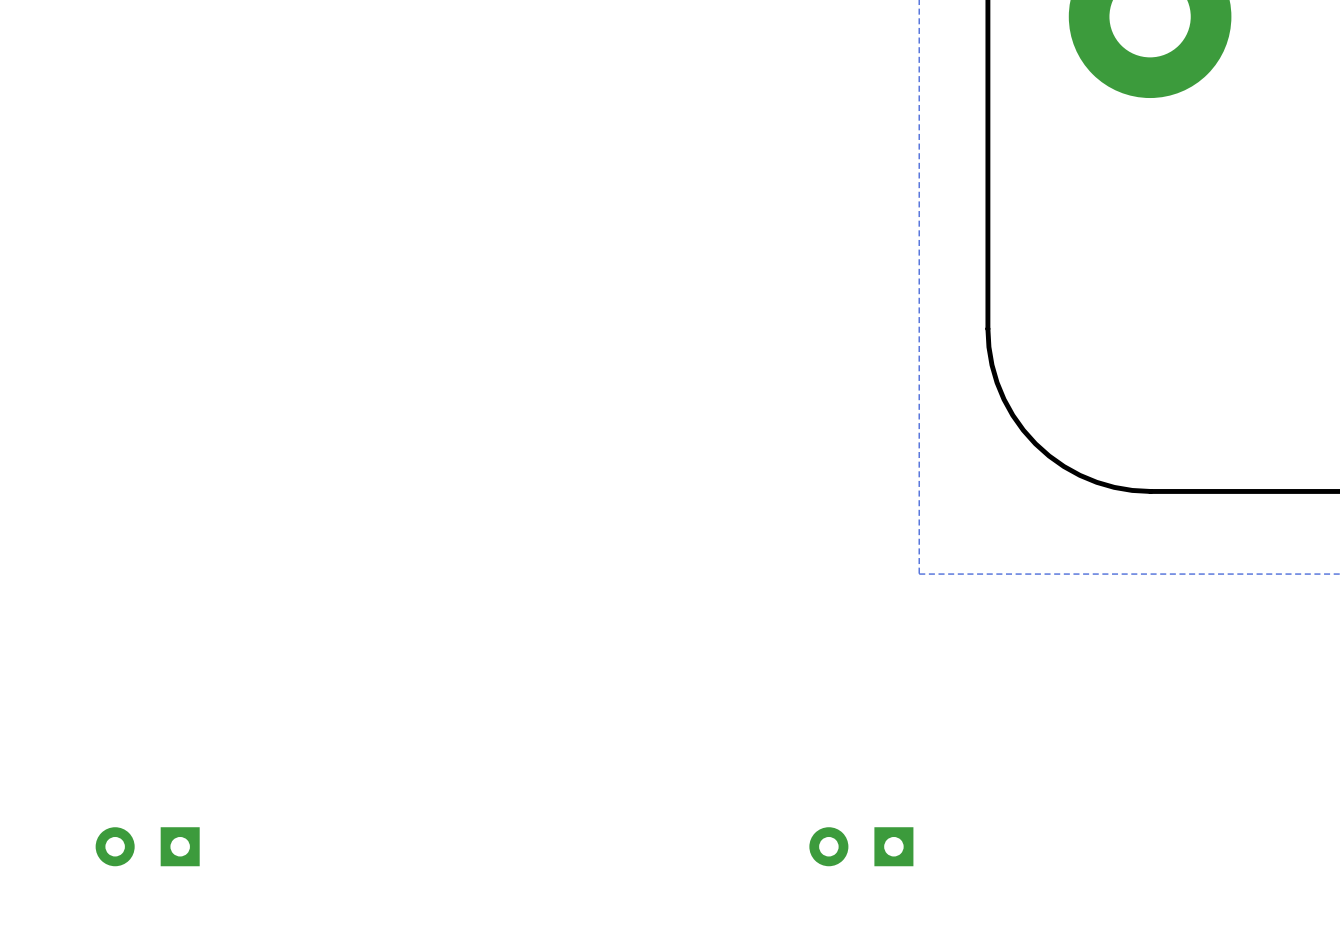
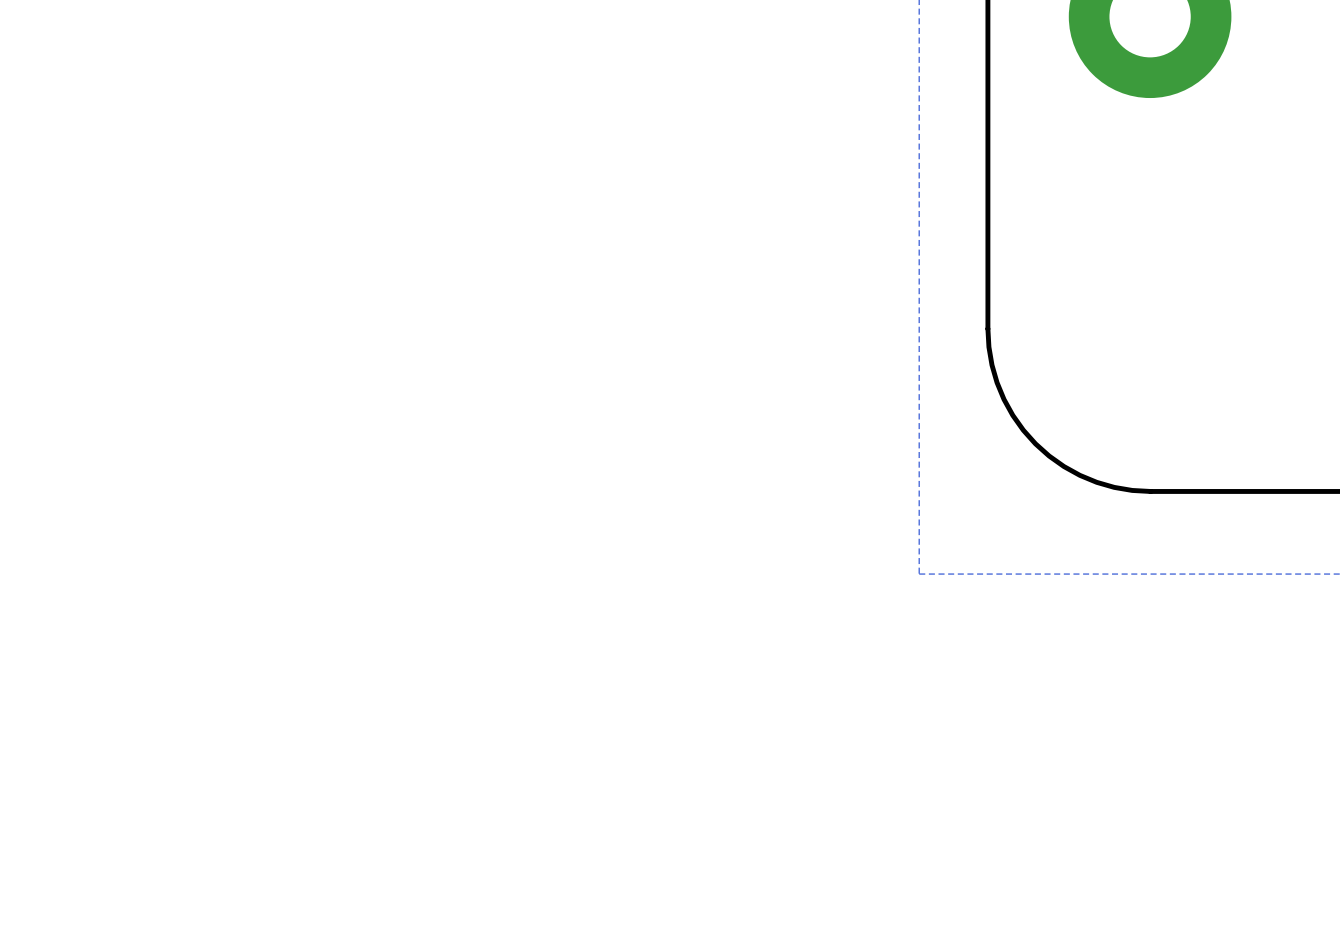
part: (147, 846) -> none
part: (861, 846) -> none

